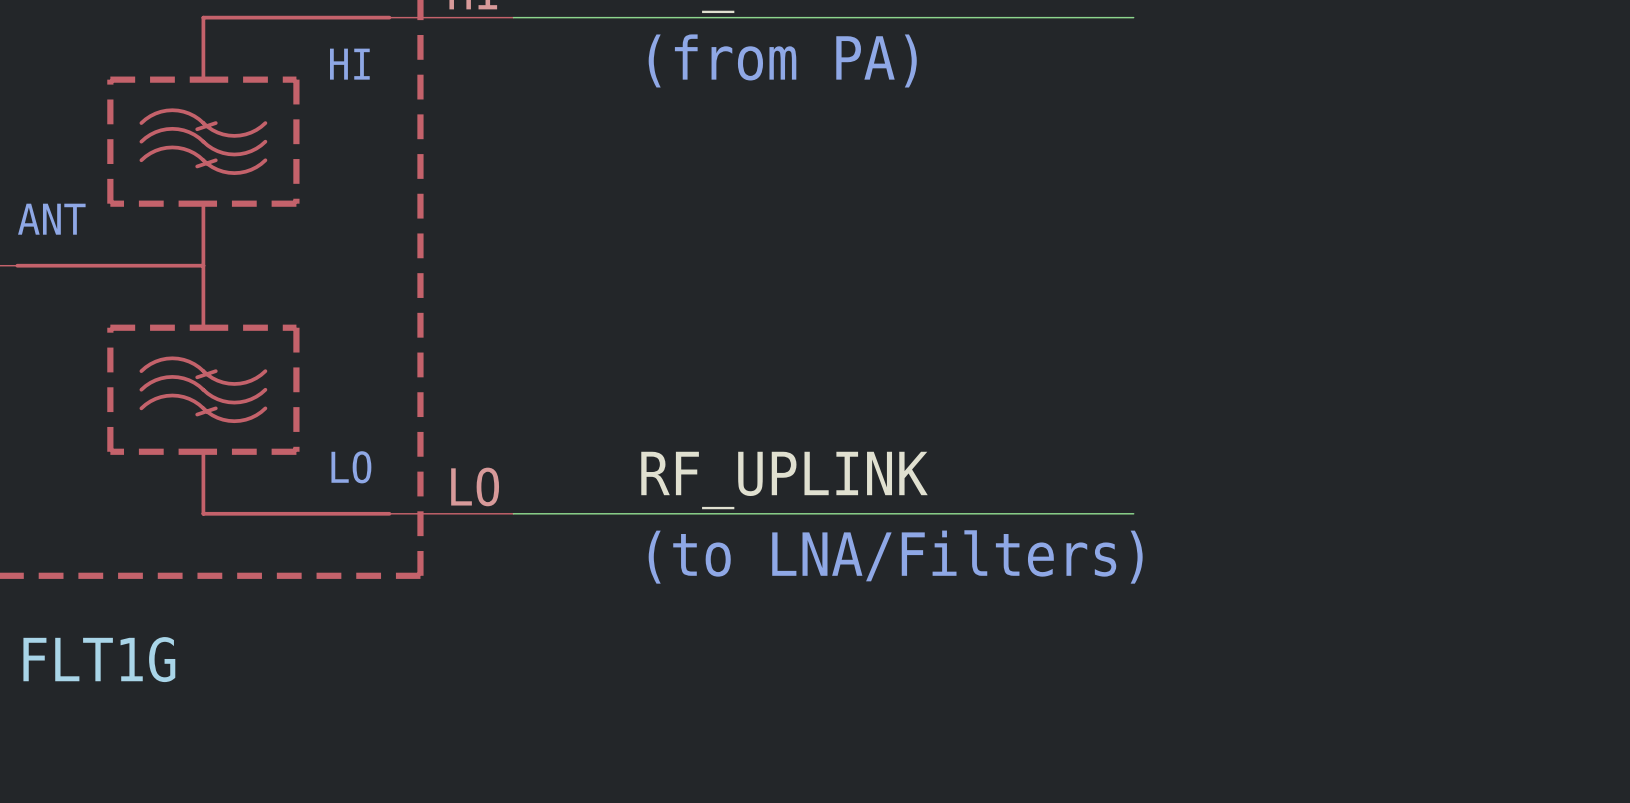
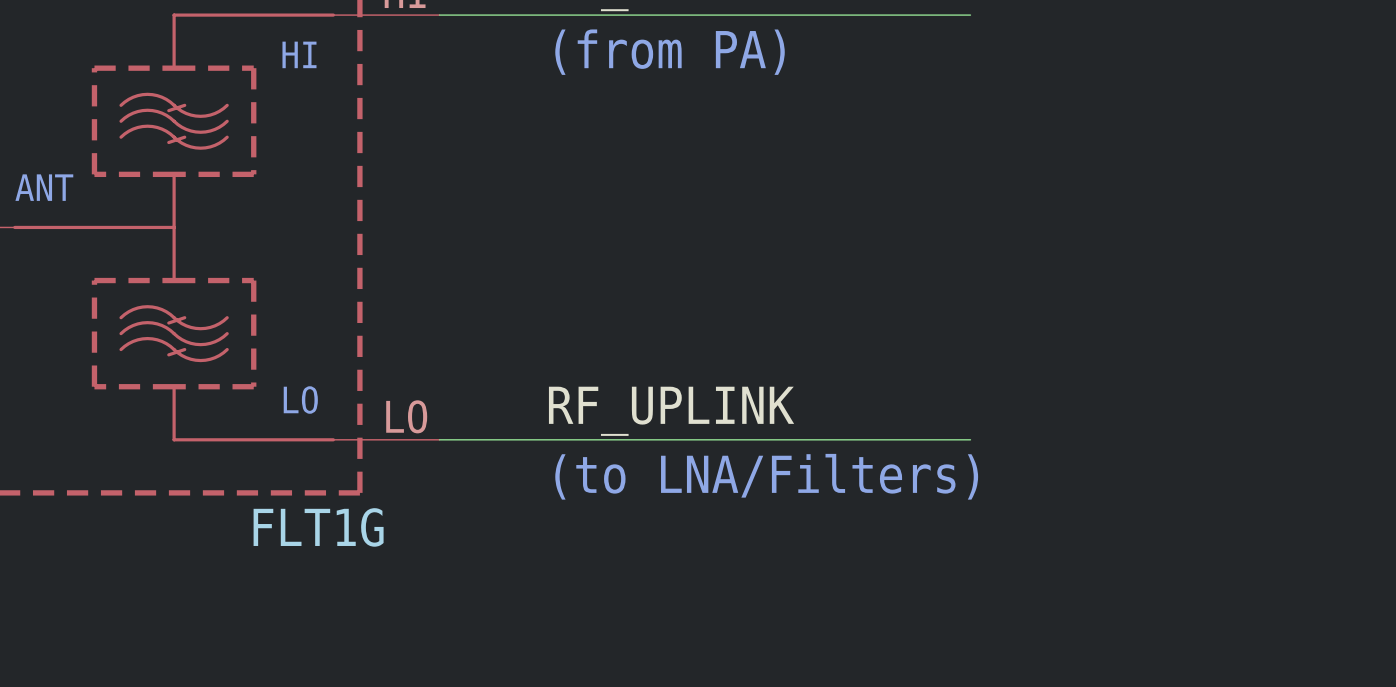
FLT1G name position: FLT1G (99, 659) -> FLT1G (318, 527)

